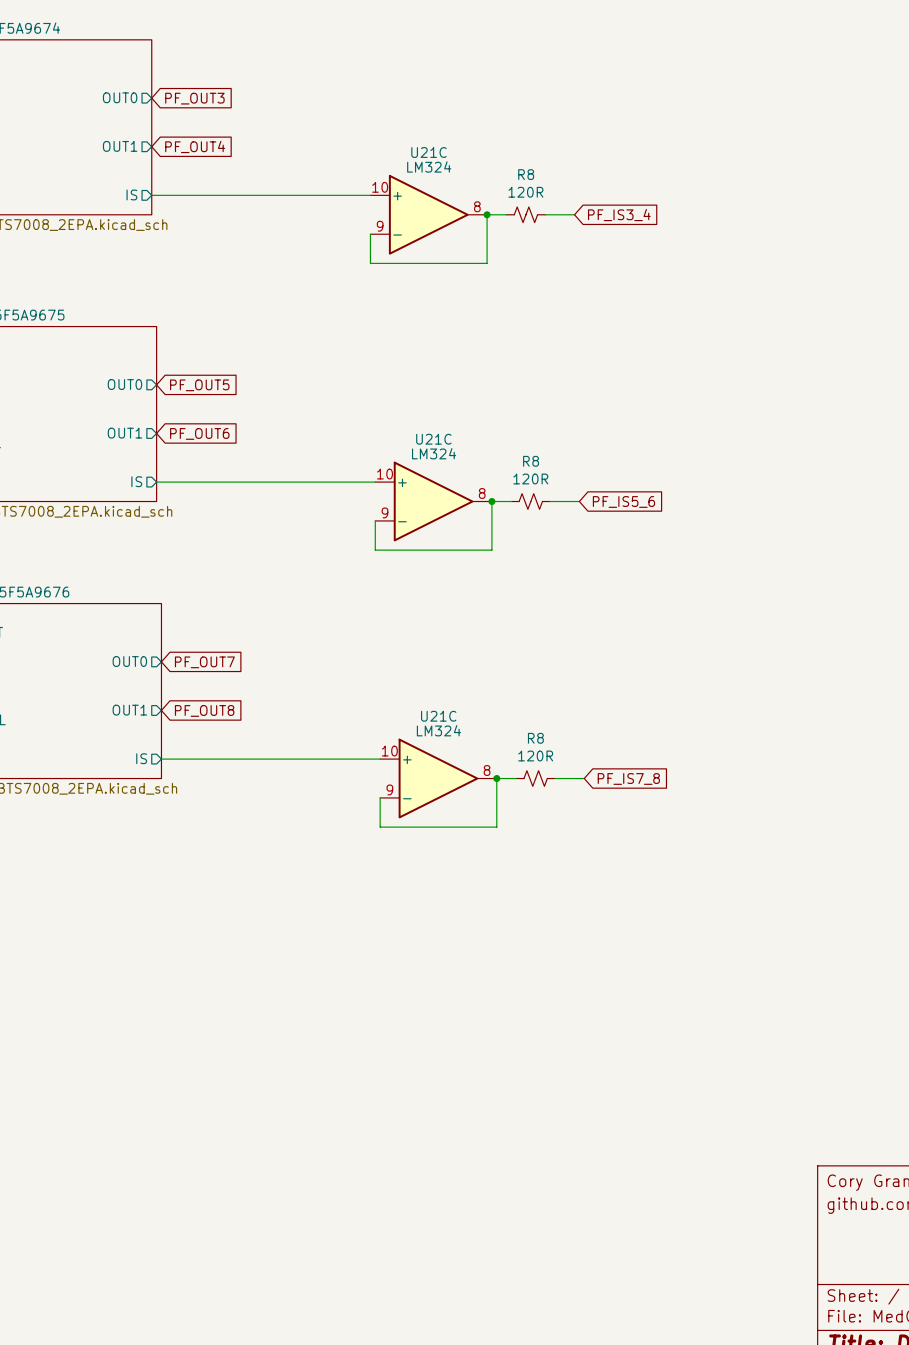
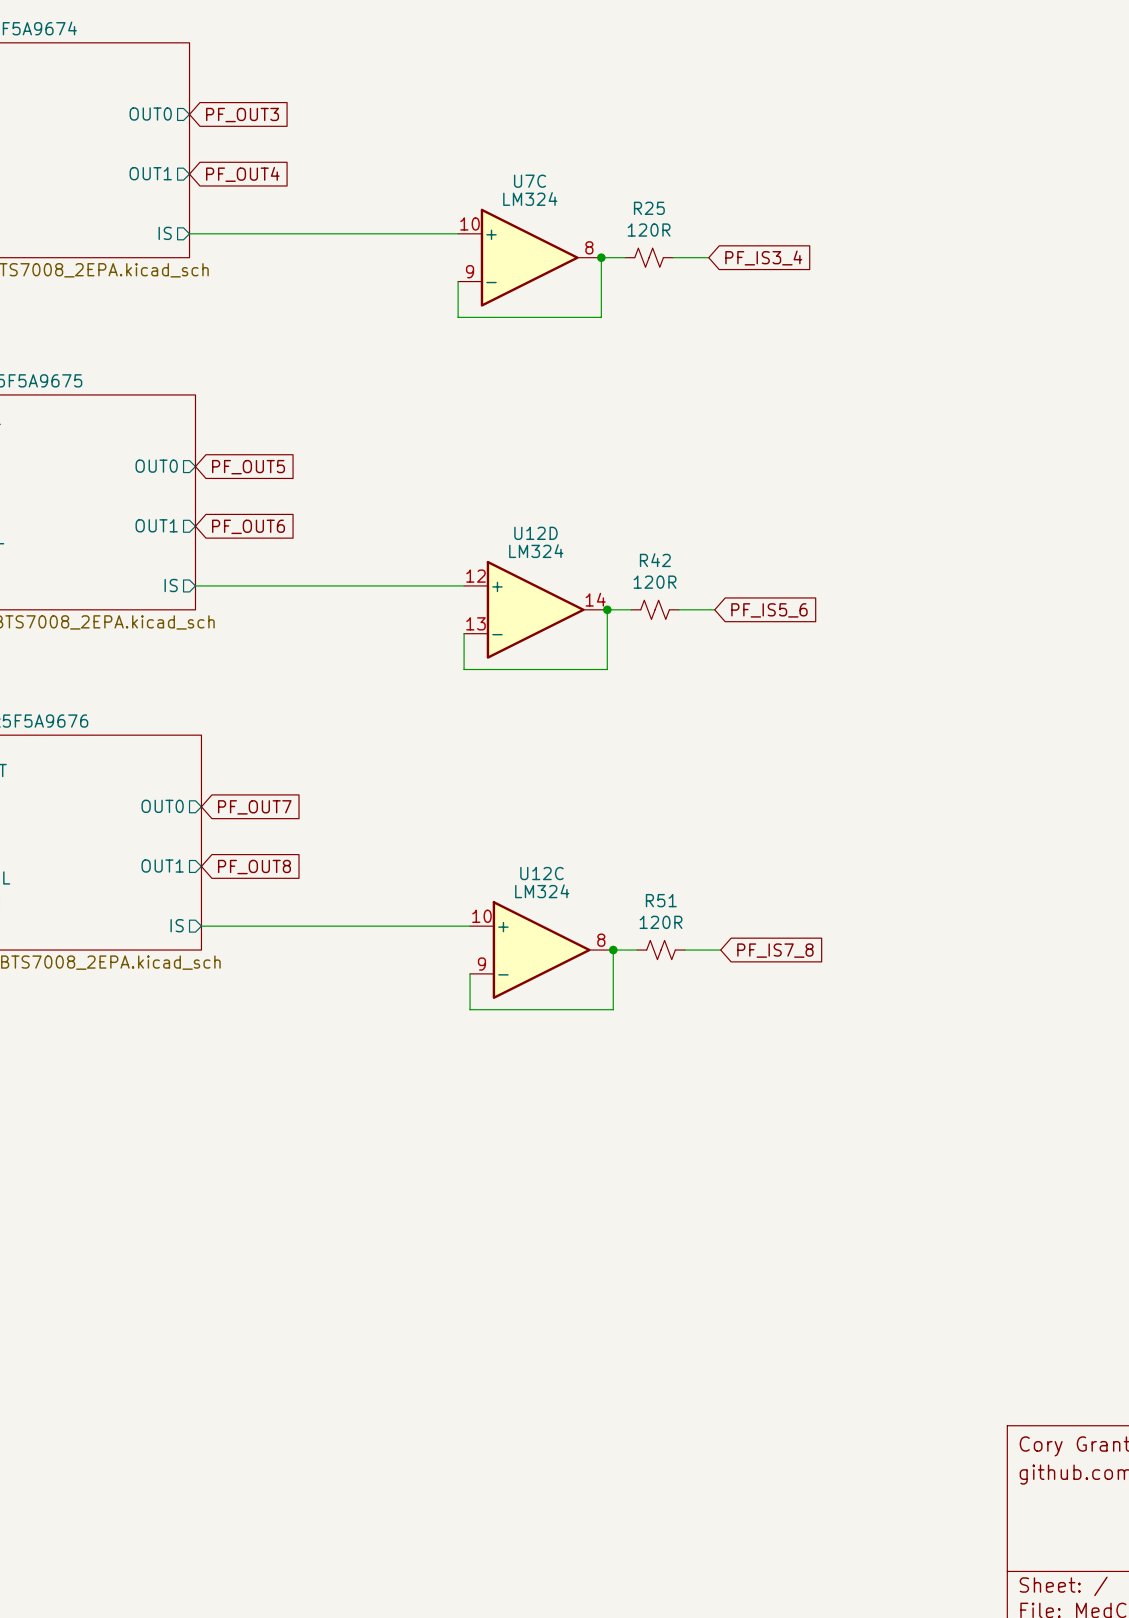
U21C name: U21C (428, 152) -> U7C (530, 181)
R8 name: R8 (526, 174) -> R25 (649, 208)
U21C name: U21C (433, 439) -> U12D (535, 533)
R8 name: R8 (531, 461) -> R42 (655, 560)
U21C pin number: 10 (385, 474) -> 12 (476, 576)
U21C pin number: 8 (482, 493) -> 14 (595, 599)
U21C pin number: 9 (385, 512) -> 13 (476, 623)
U21C name: U21C (438, 716) -> U12C (541, 873)
R8 name: R8 (535, 738) -> R51 (661, 900)

